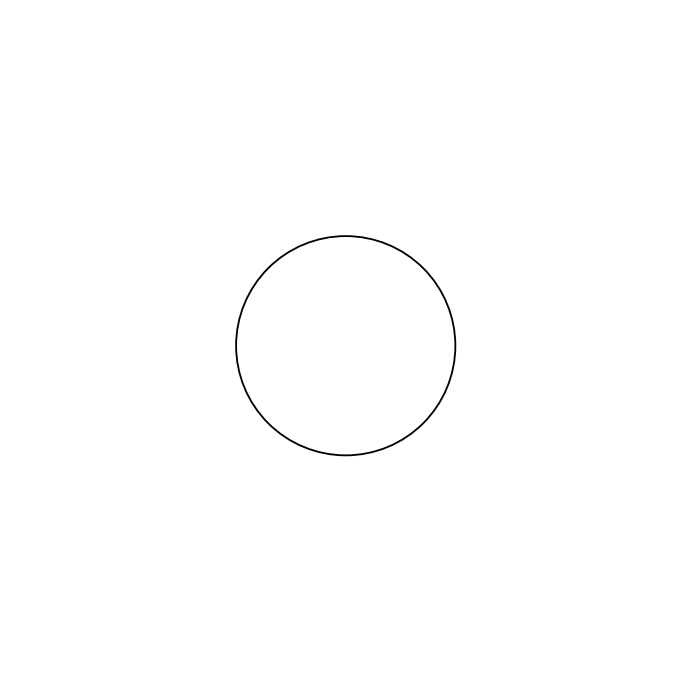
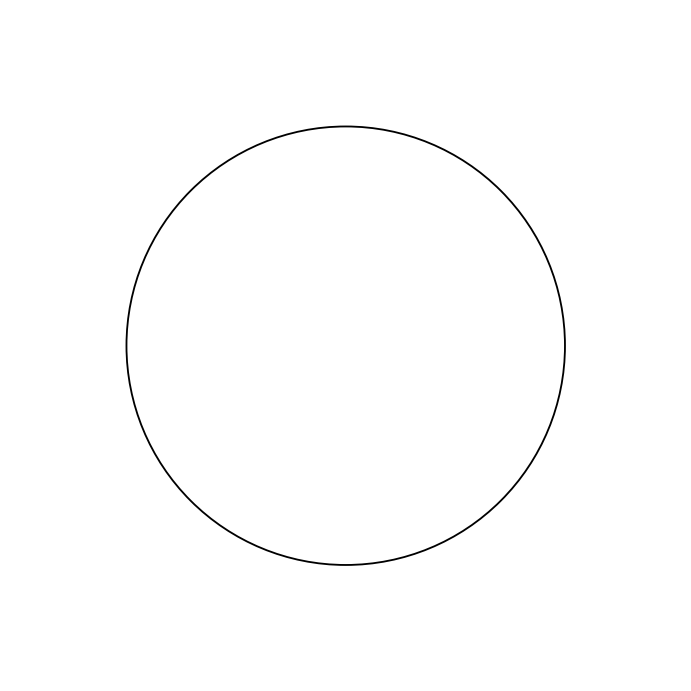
round board edge size: [235, 235, 457, 457] -> [125, 125, 566, 566]

